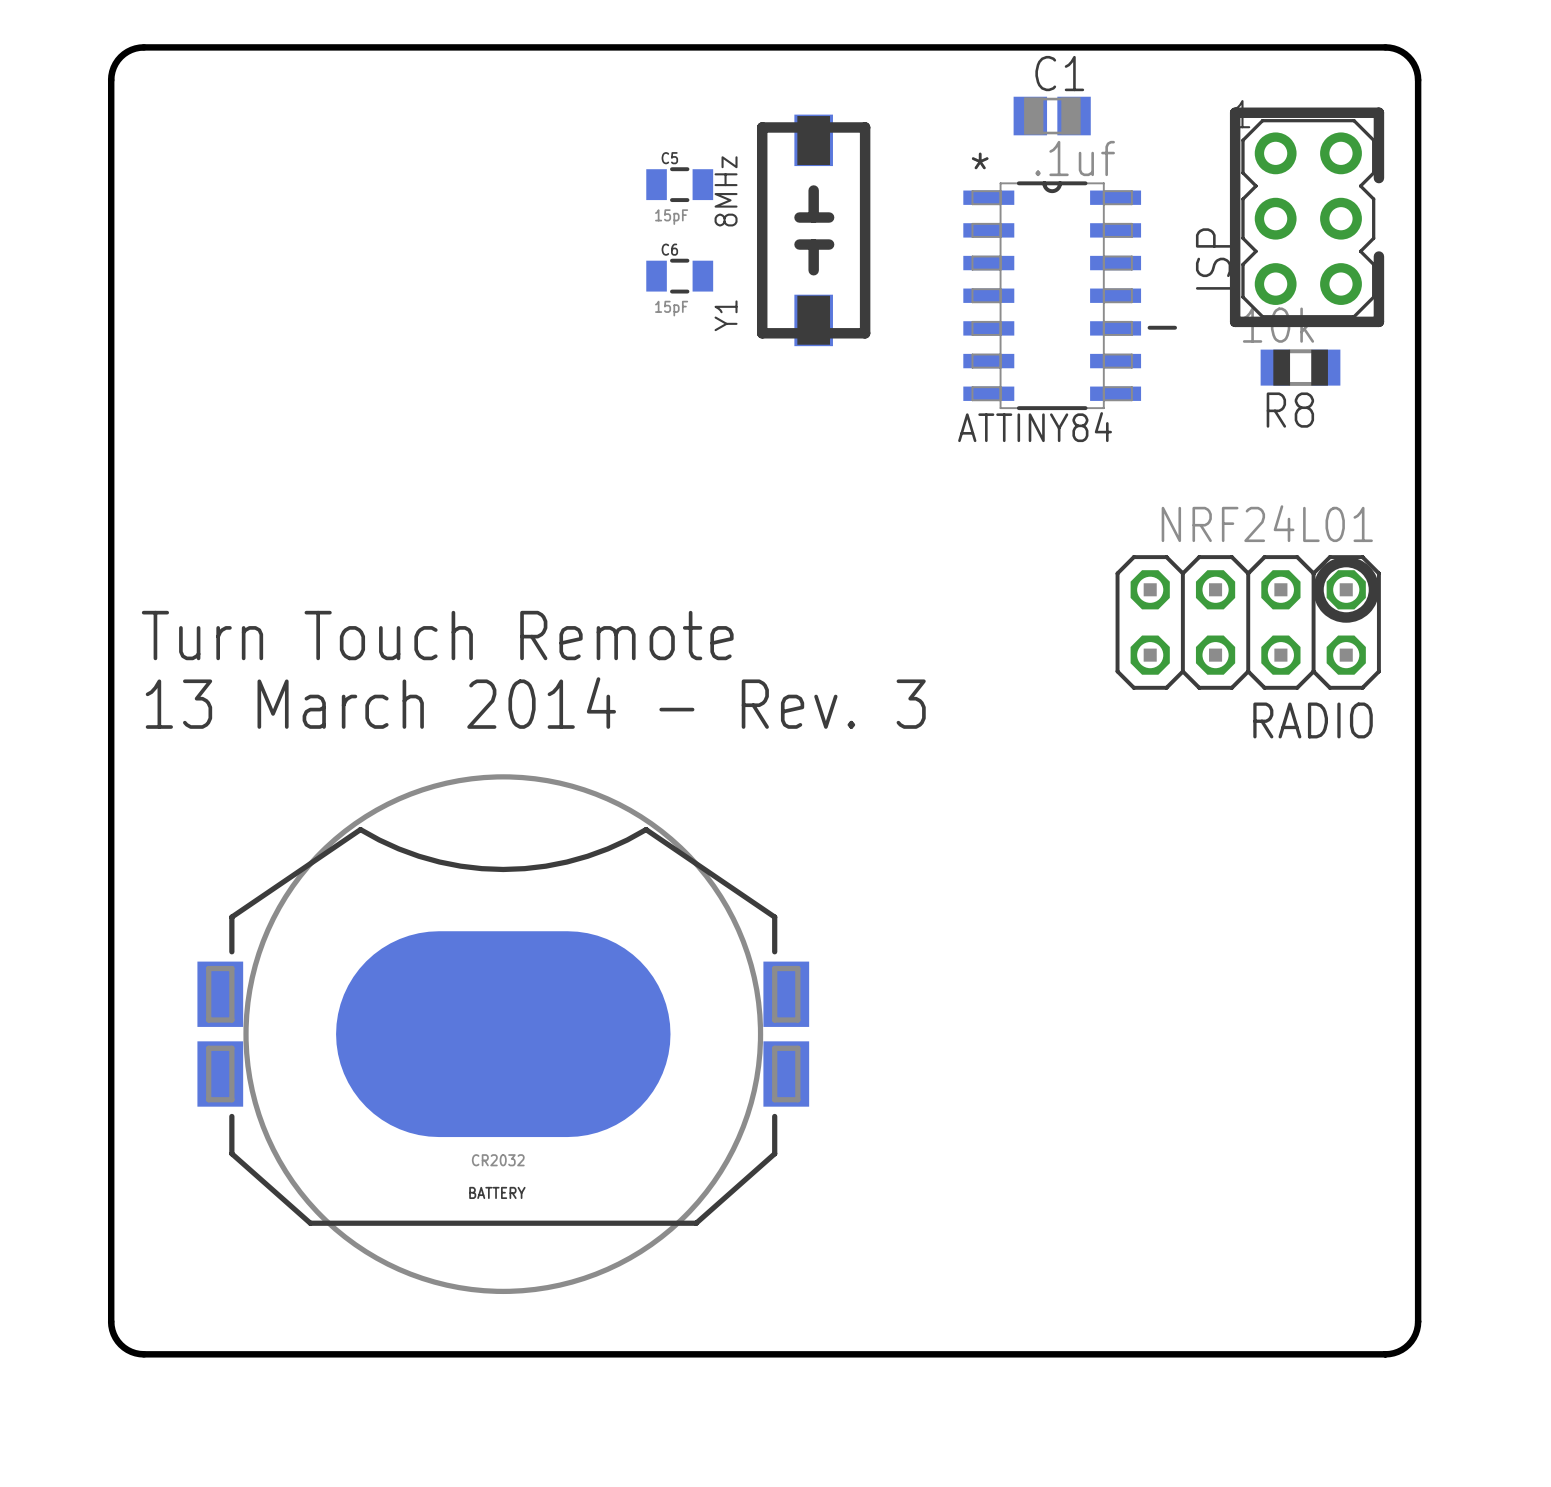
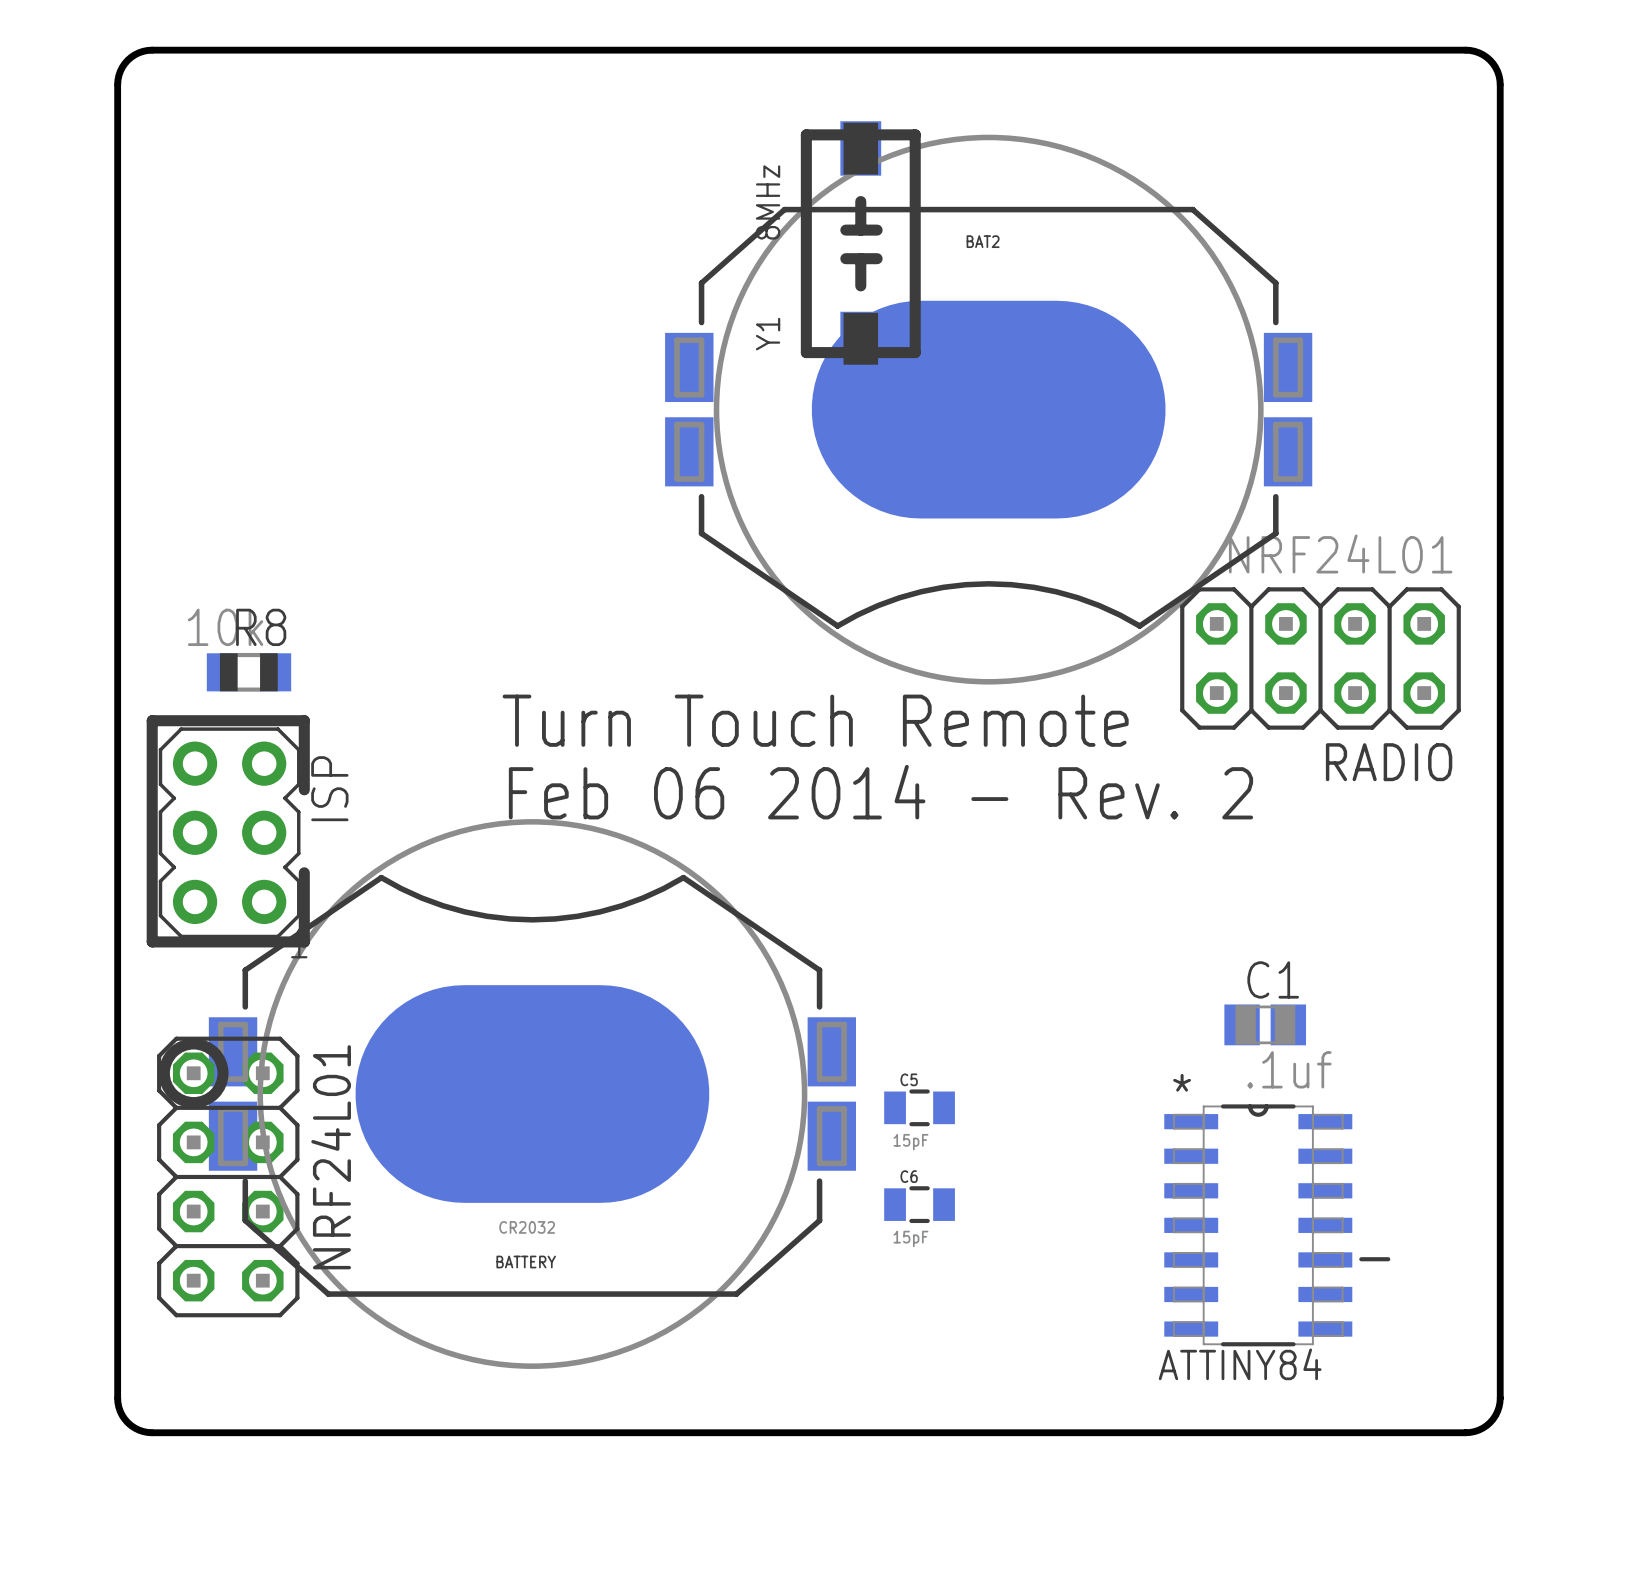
C1 position: (1052, 116) -> (1265, 1024)
line: (1378, 178) (1378, 112) (1235, 112) (1235, 321) (1378, 321) (1378, 256) -> none
C5 position: (679, 184) -> (919, 1107)
ISP: (1308, 218) -> none
C6 position: (679, 276) -> (919, 1204)
ATTINY84 position: (1070, 295) -> (1277, 1225)
R8 position: (1300, 367) -> (248, 672)
BAT2: none -> (988, 409)
R8 name position: R8 (1290, 410) -> R8 (261, 627)
drawing: [1313, 556, 1380, 623] -> none
text position: Turn Touch Remote (437, 635) -> Turn Touch Remote (815, 720)
text: 13 March 2014 - Rev. 3 (535, 703) -> Feb 06 2014 - Rev. 2 (880, 792)
line: none -> (304, 789) (304, 720) (152, 720) (152, 941) (304, 941) (304, 872)
ISP: none -> (229, 832)
drawing: none -> [158, 1038, 229, 1109]
NRF24L01: none -> (228, 1176)

